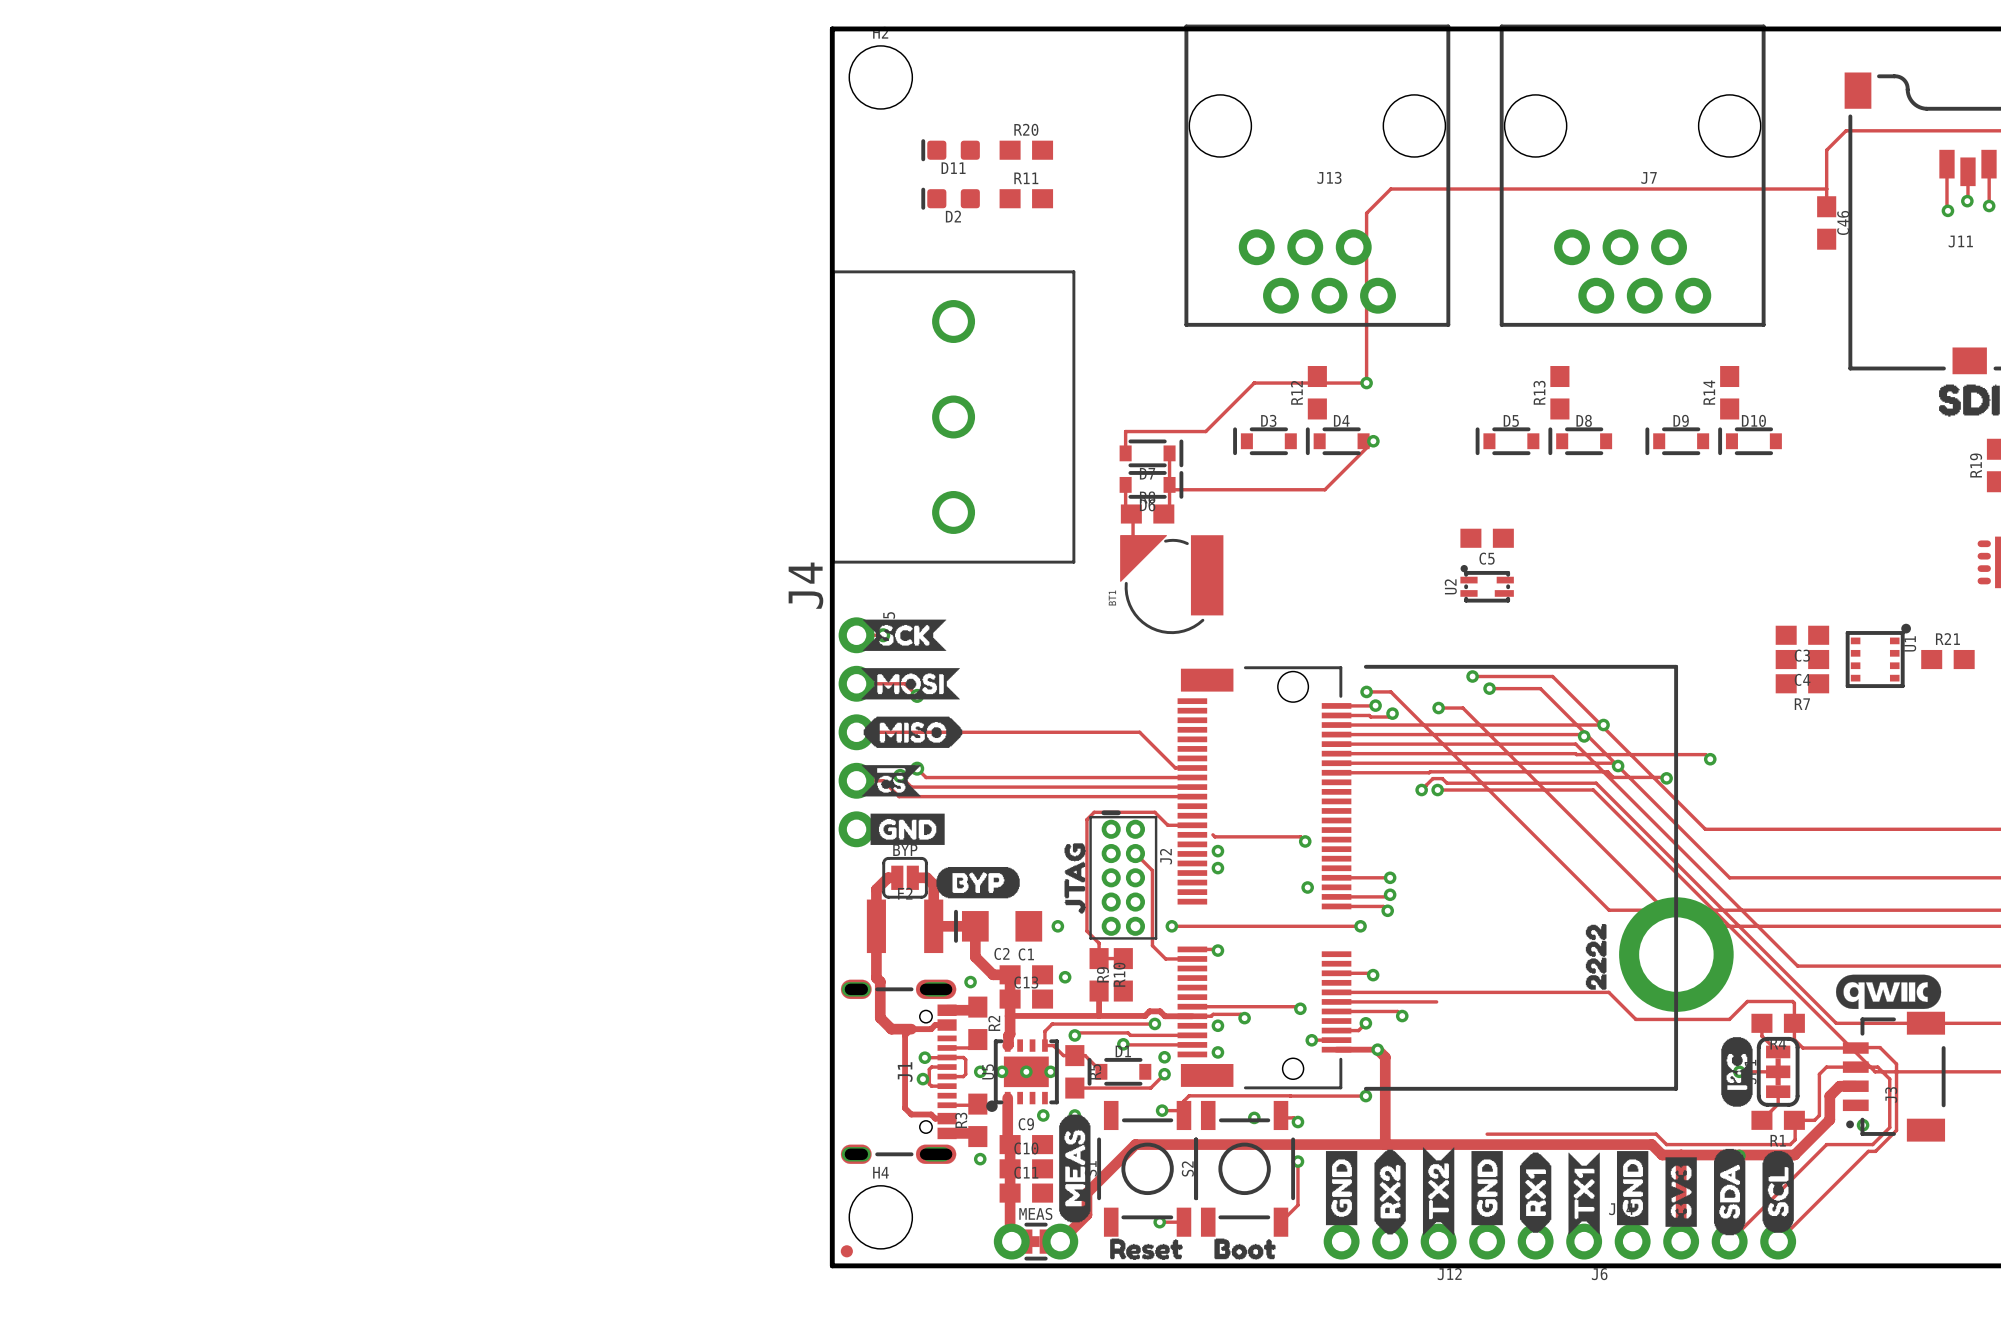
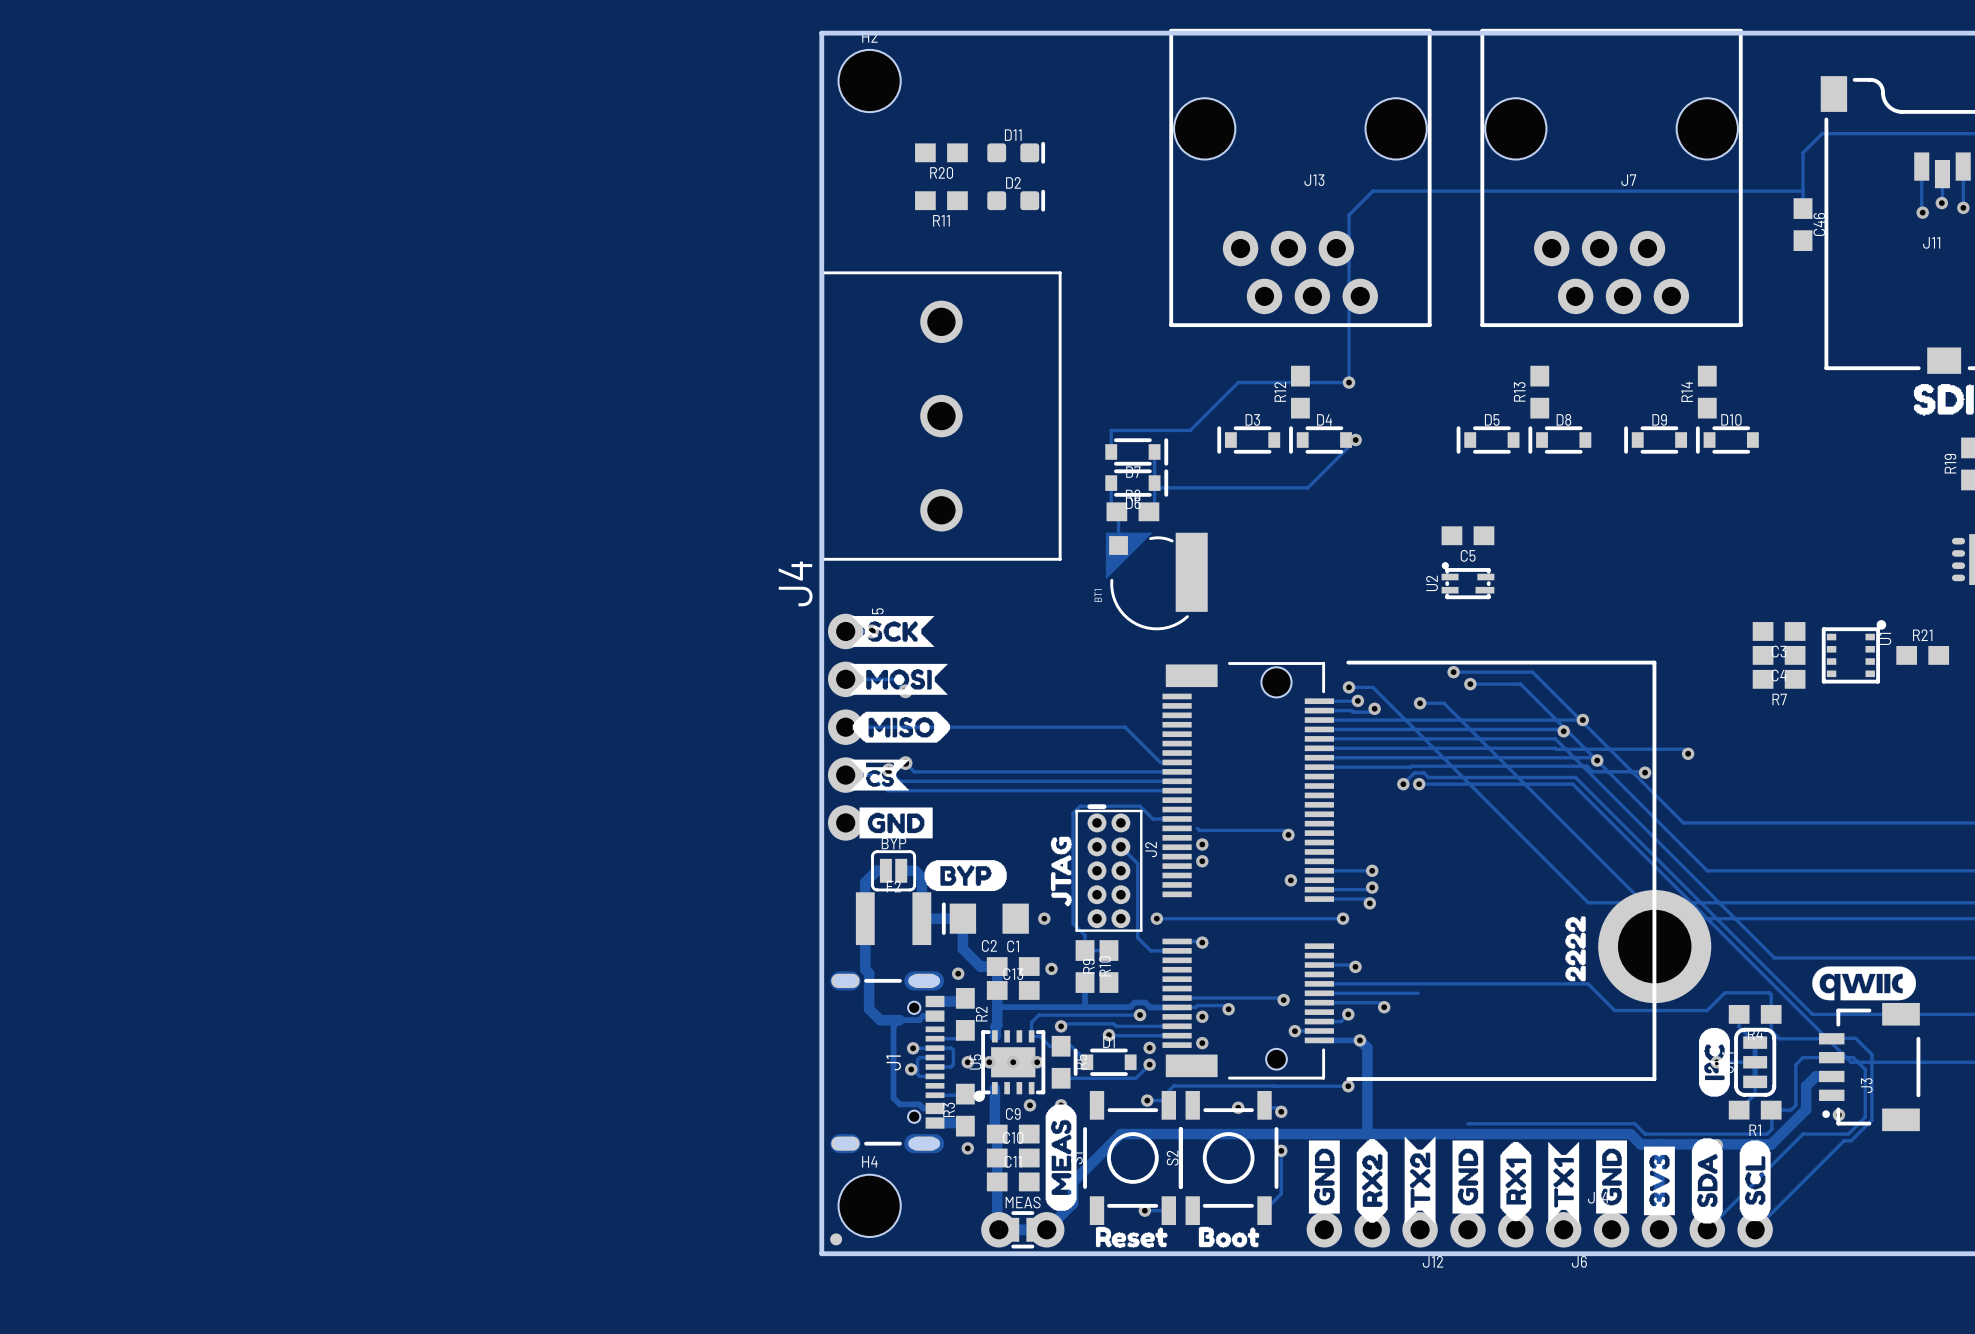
R20 name position: R20 (1026, 129) -> R20 (941, 172)
D11 rotation: 0° (950, 150) -> 180° (1016, 152)
D11 position: (950, 150) -> (1016, 152)
R20 position: (1026, 150) -> (941, 152)
R11 name position: R11 (1026, 178) -> R11 (941, 220)
D2 rotation: 0° (950, 198) -> 180° (1016, 200)
D2 position: (950, 198) -> (1016, 200)
R11 position: (1026, 198) -> (941, 200)

